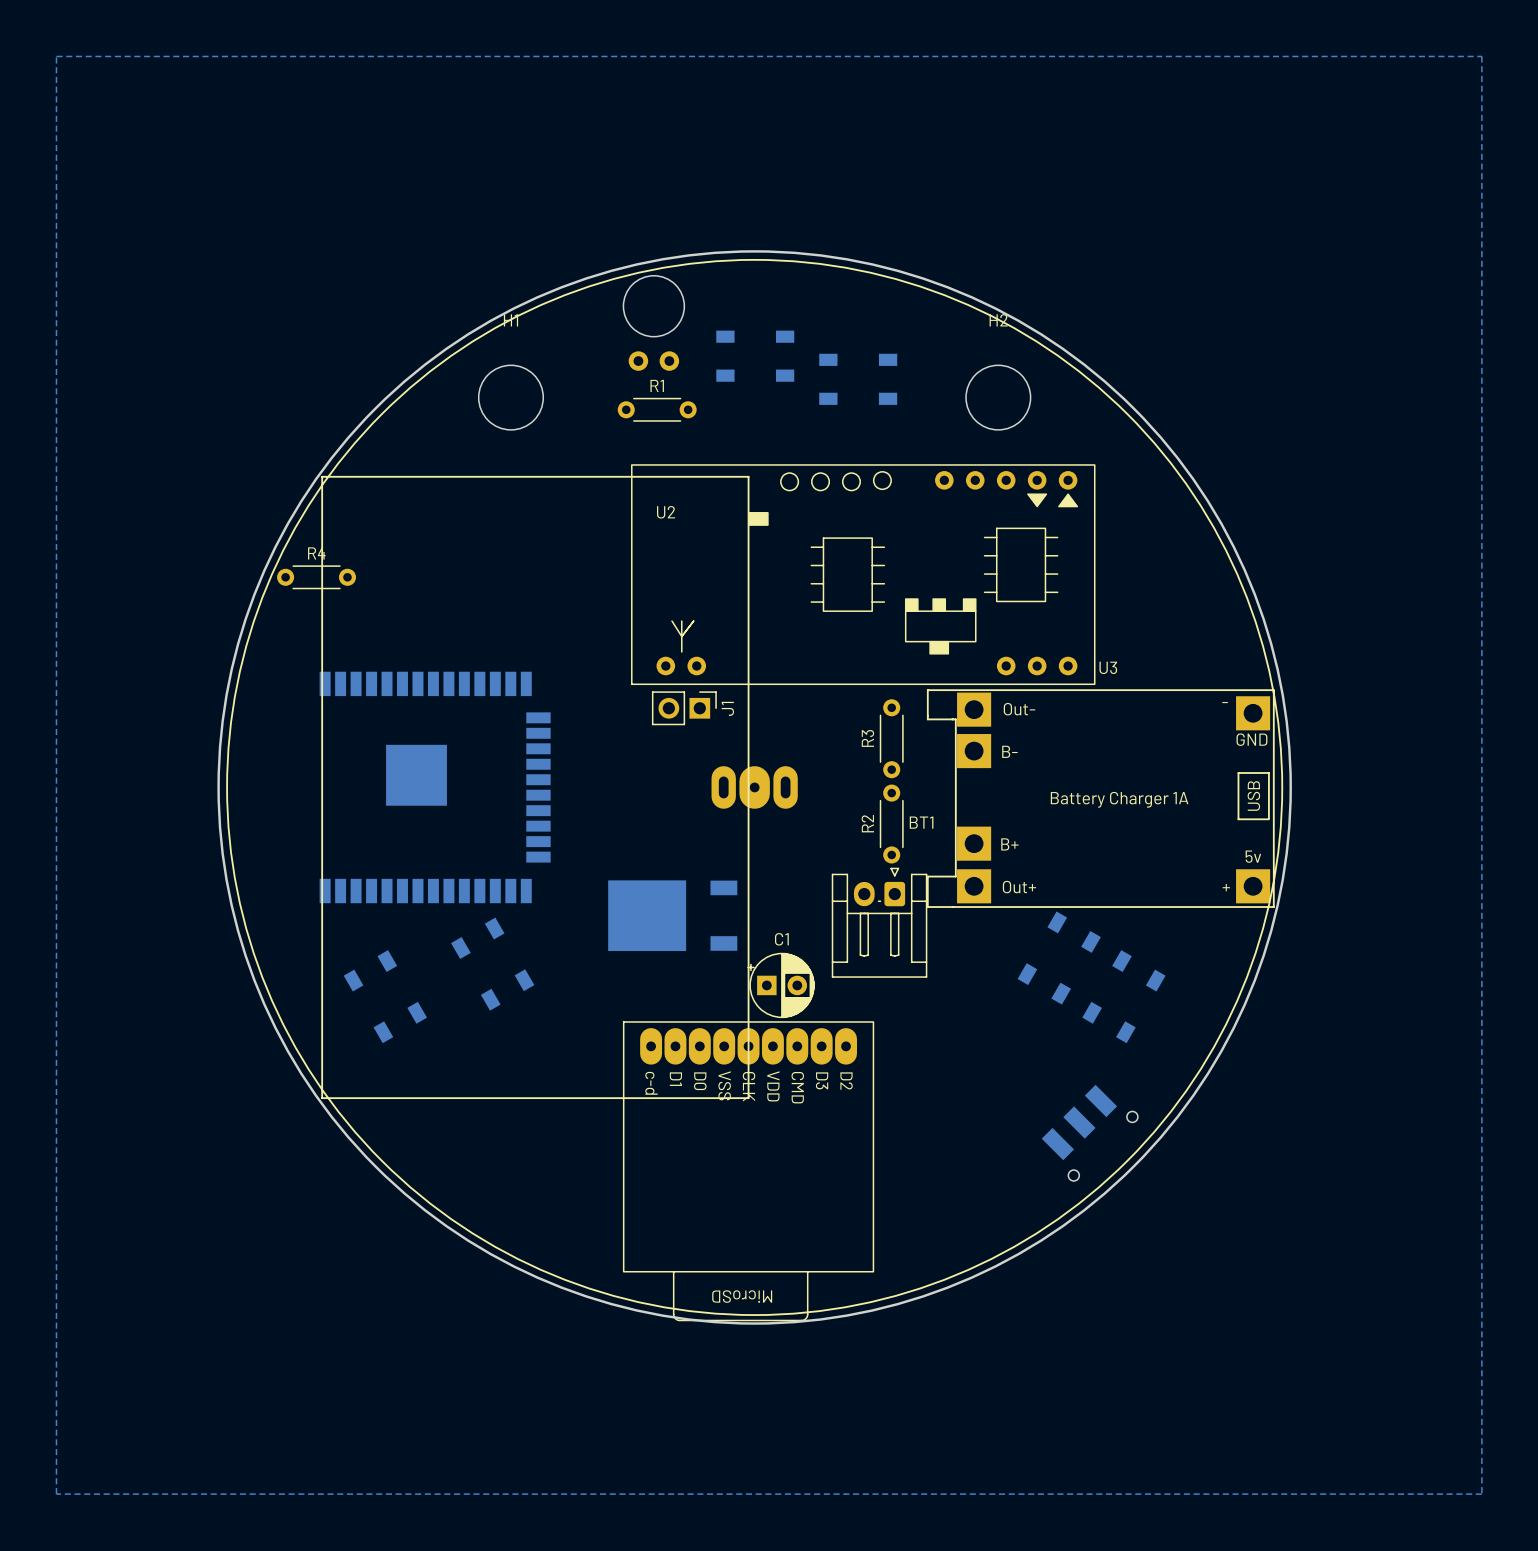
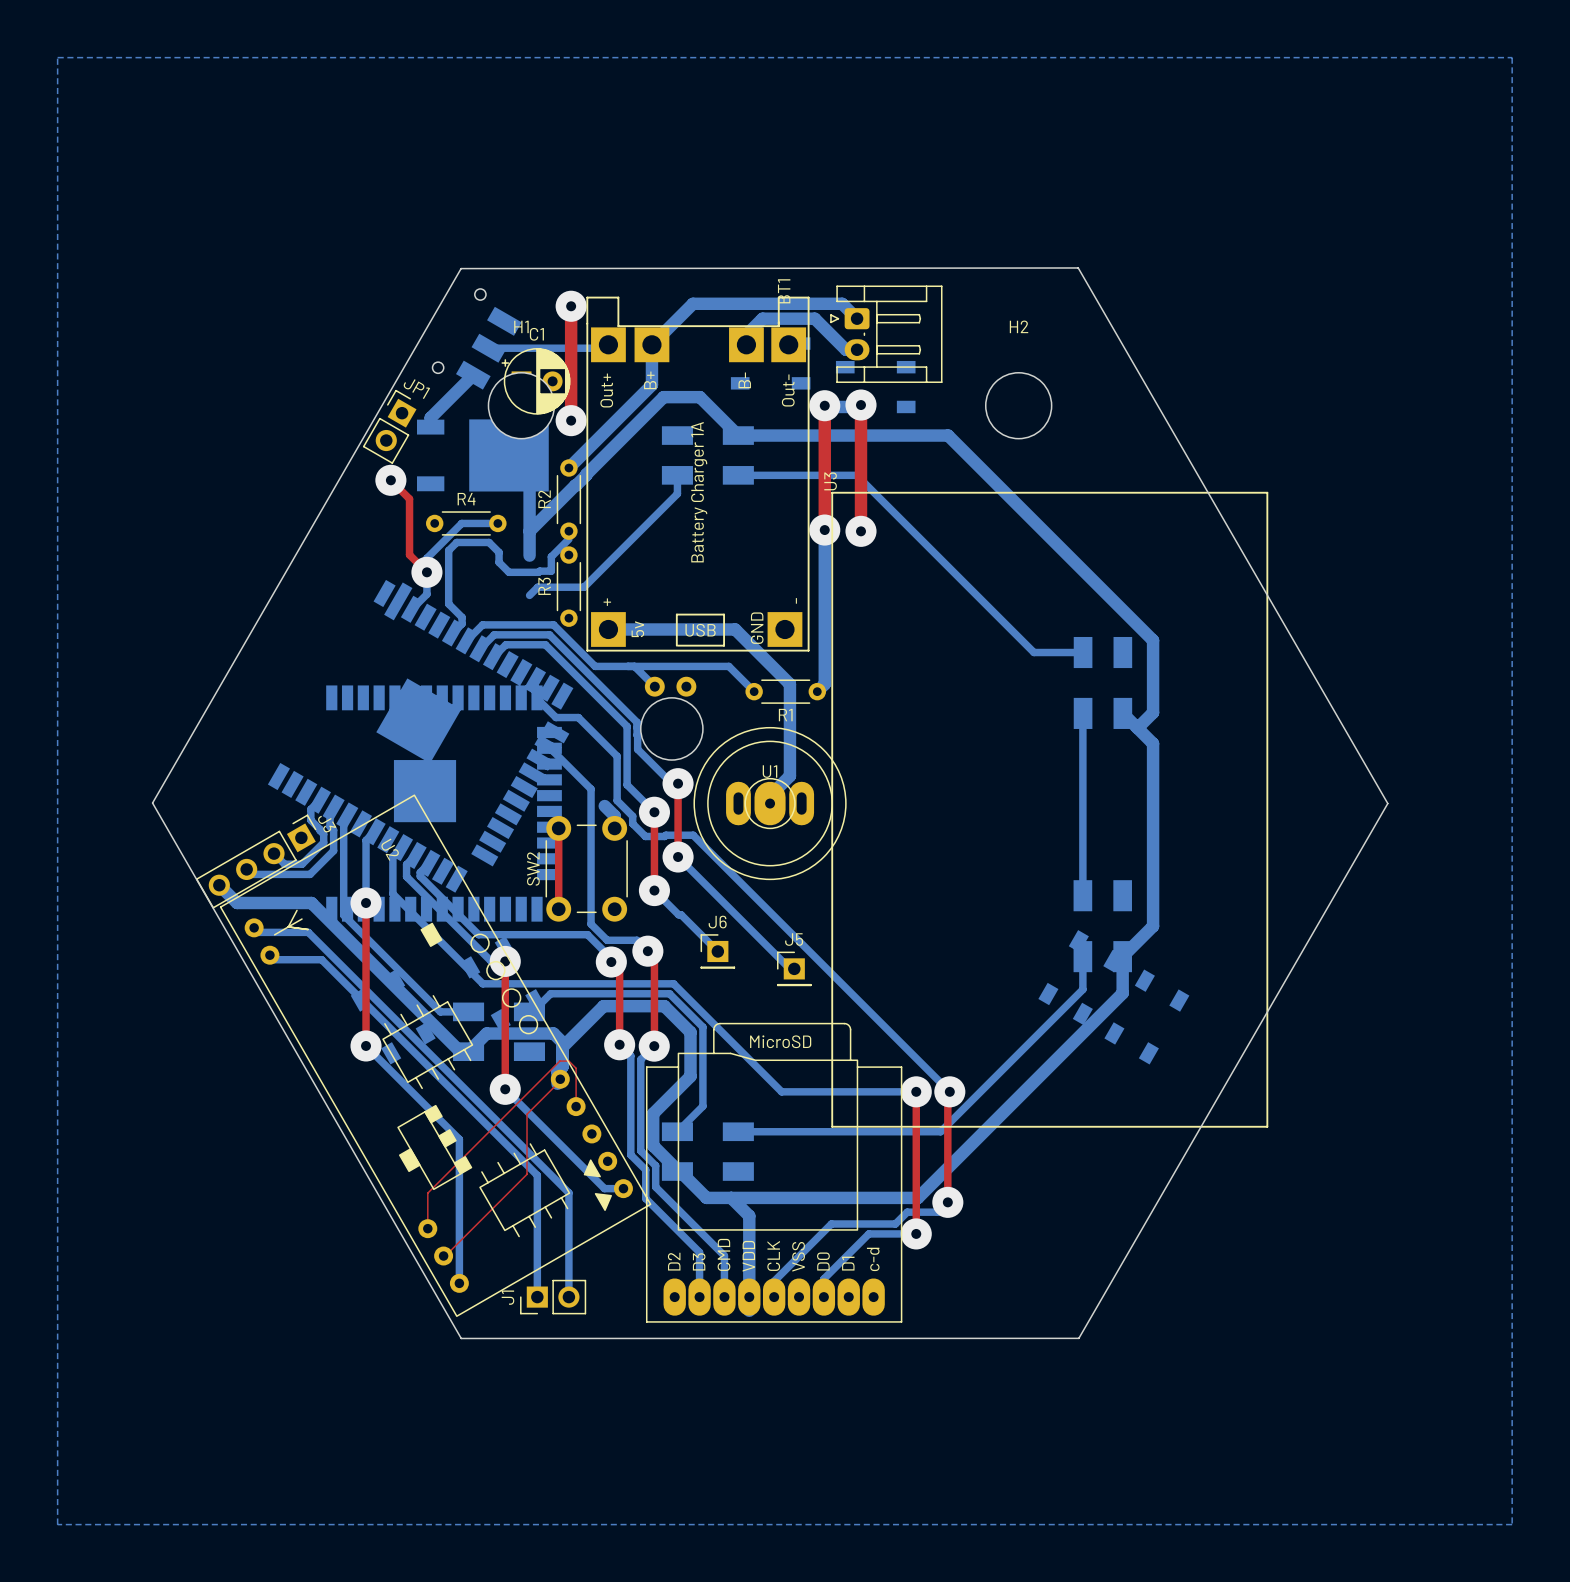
round board edge: [217, 250, 1292, 1325] -> none
drawing: [226, 258, 1284, 1316] -> none
board edge: none -> (1078, 267) (461, 268) (152, 803) (461, 1338) (1078, 1338) (1387, 803) (1078, 267)
round board edge: [622, 275, 685, 338] -> none
top track: none -> (571, 306) (571, 420)
via: none -> (571, 306)
bottom track: none -> (857, 318) (842, 303) (692, 303) (651, 344) (651, 384) (568, 468)
part: none -> (477, 339)
bottom track: none -> (608, 344) (605, 348) (488, 348)
bottom track: none -> (746, 344) (746, 334) (762, 318) (814, 318) (845, 349) (857, 349)
part: (653, 361) -> none
bottom track: none -> (473, 375) (430, 417) (430, 427)
R1 name position: R1 (657, 385) -> R1 (785, 715)
top track: none -> (861, 405) (861, 531)
via: none -> (861, 405)
top track: none -> (824, 405) (824, 530)
via: none -> (824, 405)
R1 position: (657, 409) -> (785, 691)
via: none -> (571, 420)
JP1: none -> (389, 426)
part: none -> (482, 455)
bottom track: none -> (508, 455) (529, 476) (529, 555)
part: none -> (707, 455)
bottom track: none -> (677, 475) (677, 493) (584, 587) (537, 587) (529, 595)
bottom track: none -> (738, 475) (856, 475) (1033, 652) (1083, 652)
top track: none -> (390, 480) (409, 498) (409, 554) (426, 572)
via: none -> (390, 480)
line: (322, 476) (322, 1098) (748, 1098) (748, 476) (322, 476) -> none
line: none -> (832, 492) (1267, 492) (1267, 1126) (832, 1126) (832, 492)
bottom track: none -> (497, 523) (461, 523) (426, 558) (426, 594) (411, 609)
bottom track: none -> (824, 530) (824, 684) (817, 691)
via: none -> (824, 530)
bottom track: none -> (529, 531) (663, 397) (699, 397) (738, 435) (948, 435) (1153, 640) (1153, 712) (1137, 728)
via: none -> (861, 531)
bottom track: none -> (568, 539) (551, 556) (551, 571) (538, 572) (508, 572) (499, 562) (499, 552) (489, 542) (456, 542) (448, 550) (448, 604) (462, 617) (462, 623) (452, 632)
via: none -> (426, 572)
U2 rotation: 0° (863, 574) -> 60° clockwise (435, 1055)
U2 position: (863, 574) -> (435, 1055)
R4 position: (316, 577) -> (466, 523)
bottom track: none -> (608, 629) (735, 629) (789, 684) (789, 776) (770, 795) (770, 803)
bottom track: none -> (466, 640) (482, 624) (553, 624) (595, 666) (728, 666) (754, 691)
bottom track: none -> (480, 648) (494, 634) (549, 634) (637, 722) (637, 749) (671, 783) (678, 783)
bottom track: none -> (493, 656) (505, 644) (545, 644) (627, 726) (627, 784) (654, 812)
bottom track: none -> (634, 666) (654, 686)
part: none -> (1102, 682)
part: none -> (670, 686)
bottom track: none -> (548, 688) (539, 697) (539, 701) (555, 717) (578, 717) (617, 756) (617, 800) (632, 816) (632, 823) (645, 836) (693, 835) (949, 1091)
round board edge: none -> [640, 697, 704, 761]
bottom track: none -> (1083, 713) (1082, 895)
bottom track: none -> (1122, 713) (1153, 743) (1153, 926) (1122, 956) (1122, 993) (918, 1197) (706, 1197) (653, 1145) (653, 1113) (690, 1076) (690, 1032) (664, 1006) (603, 1006) (562, 1047)
J1 rotation: 0° (684, 708) -> 180° (553, 1297)
J1 position: (684, 708) -> (553, 1297)
part: none -> (420, 736)
bottom track: none -> (547, 746) (591, 789) (591, 924) (607, 940) (636, 940) (647, 951)
R3 position: (891, 738) -> (568, 586)
top track: none -> (678, 783) (678, 857)
via: none -> (678, 783)
bottom track: none -> (319, 800) (310, 809) (310, 820) (323, 834) (323, 842) (302, 864) (284, 864) (274, 853)
U1 side: bottom (754, 787) -> top (770, 803)
bottom track: none -> (604, 806) (614, 815) (614, 828)
bottom track: none -> (333, 808) (330, 811) (330, 826) (333, 830) (333, 850) (310, 874) (251, 874) (246, 869)
top track: none -> (654, 812) (654, 890)
via: none -> (654, 812)
U3 rotation: 0° (1100, 798) -> 90° clockwise (697, 474)
U3 position: (1100, 798) -> (697, 474)
bottom track: none -> (347, 816) (343, 819) (343, 915) (440, 1011) (468, 1011)
top track: none -> (558, 828) (558, 909)
bottom track: none -> (374, 831) (366, 840) (366, 902)
R2 position: (891, 824) -> (568, 499)
bottom track: none -> (401, 847) (392, 856) (392, 893) (482, 983) (673, 983) (781, 1091) (916, 1091)
bottom track: none -> (415, 855) (406, 864) (406, 876) (491, 961) (505, 961)
bottom track: none -> (678, 857) (789, 968) (794, 968)
via: none -> (678, 857)
J3: none -> (256, 861)
bottom track: none -> (429, 863) (420, 872) (420, 876) (478, 934) (587, 934) (611, 958) (611, 962)
SW2: none -> (586, 868)
bottom track: none -> (219, 885) (237, 902) (311, 902) (460, 1051) (468, 1051) (486, 1033) (553, 1033) (562, 1042) (562, 1066) (557, 1071) (557, 1083)
bottom track: none -> (654, 890) (717, 951)
via: none -> (654, 890)
top track: none -> (366, 902) (366, 1045)
via: none -> (366, 902)
part: none -> (1102, 926)
bottom track: none -> (251, 932) (308, 932) (568, 1192) (568, 1297)
part: (672, 915) -> none
BT1 rotation: 0° (879, 922) -> 90° counterclockwise (886, 334)
BT1 position: (879, 922) -> (886, 334)
top track: none -> (647, 951) (654, 957) (654, 1046)
via: none -> (647, 951)
J6: none -> (717, 951)
bottom track: none -> (1082, 956) (1082, 989) (940, 1131) (738, 1131)
bottom track: none -> (267, 959) (321, 959) (537, 1175) (537, 1297)
top track: none -> (505, 961) (505, 1089)
via: none -> (505, 961)
top track: none -> (611, 962) (619, 970) (619, 1044)
via: none -> (611, 962)
J5: none -> (794, 968)
C1 position: (780, 985) -> (535, 381)
bottom track: none -> (529, 1011) (532, 1011) (550, 993) (669, 993) (702, 1027) (702, 1106) (677, 1131)
part: none -> (499, 1031)
bottom track: none -> (619, 1044) (630, 1055) (630, 1154) (645, 1169) (645, 1198) (699, 1252) (699, 1297)
via: none -> (619, 1044)
bottom track: none -> (366, 1045) (459, 1139) (459, 1283)
via: none -> (366, 1045)
bottom track: none -> (654, 1046) (640, 1059) (640, 1150) (655, 1165) (655, 1187) (724, 1255) (724, 1297)
via: none -> (654, 1046)
top track: none -> (557, 1083) (527, 1114) (527, 1174) (440, 1260)
bottom track: none -> (505, 1089) (604, 1188) (623, 1188)
via: none -> (505, 1089)
top track: none -> (916, 1091) (916, 1233)
via: none -> (916, 1091)
top track: none -> (949, 1091) (947, 1093) (947, 1202)
via: none -> (949, 1091)
top track: none -> (576, 1106) (576, 1068) (568, 1061) (559, 1061) (427, 1193) (427, 1228)
part: none -> (707, 1151)
part: (1089, 1132) -> none
part: none -> (774, 1172)
part: (748, 1171) -> none
bottom track: none -> (731, 1197) (749, 1215) (749, 1310)
bottom track: none -> (947, 1202) (938, 1212) (907, 1212) (895, 1223) (831, 1223) (774, 1281) (774, 1310)
via: none -> (947, 1202)
bottom track: none -> (916, 1233) (868, 1233) (823, 1278) (823, 1297)
via: none -> (916, 1233)

